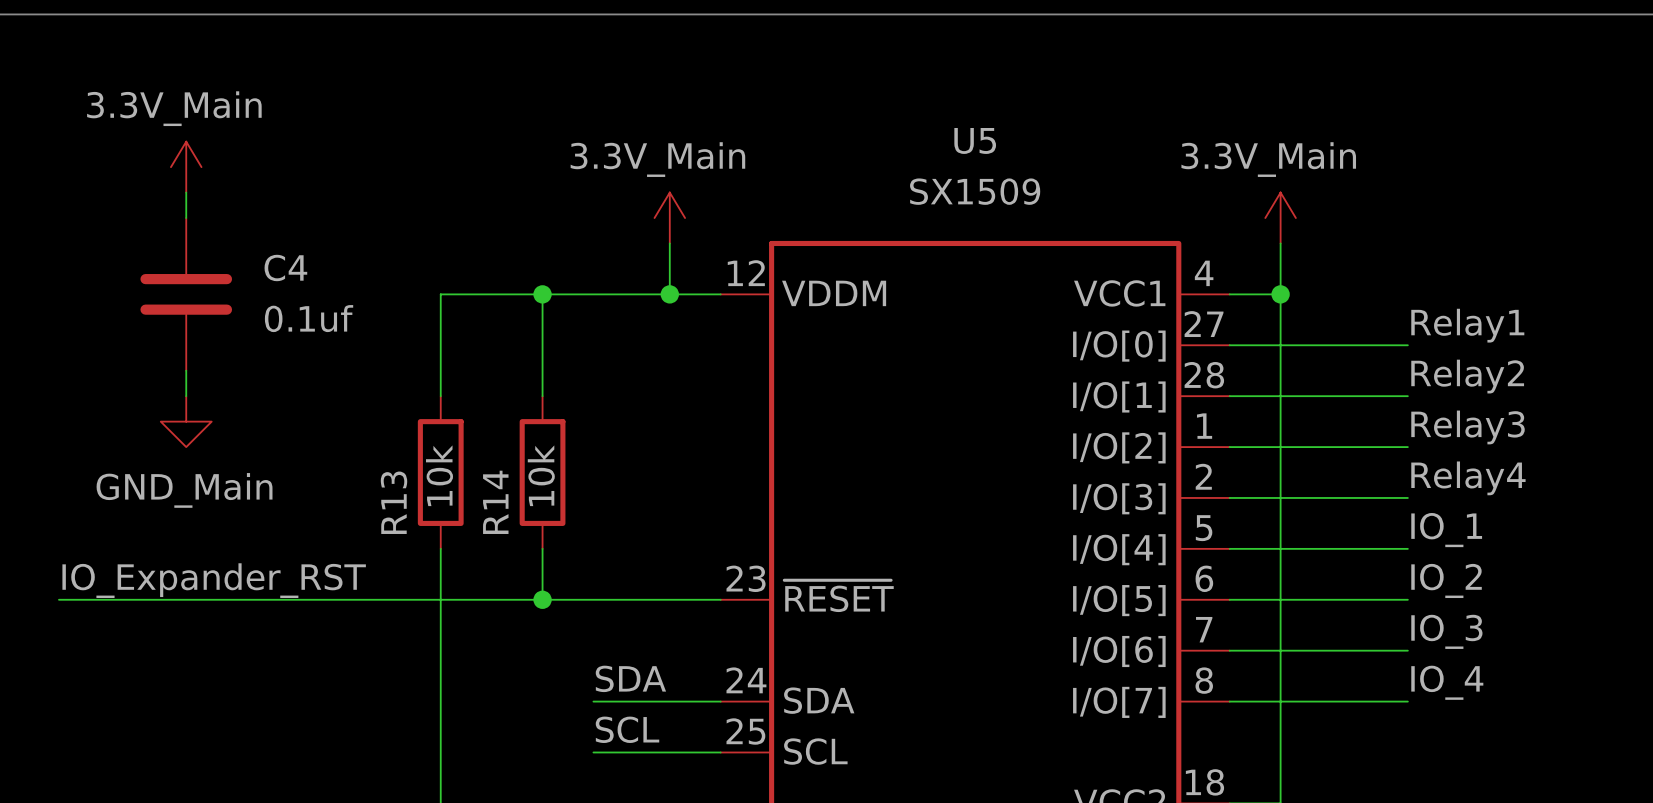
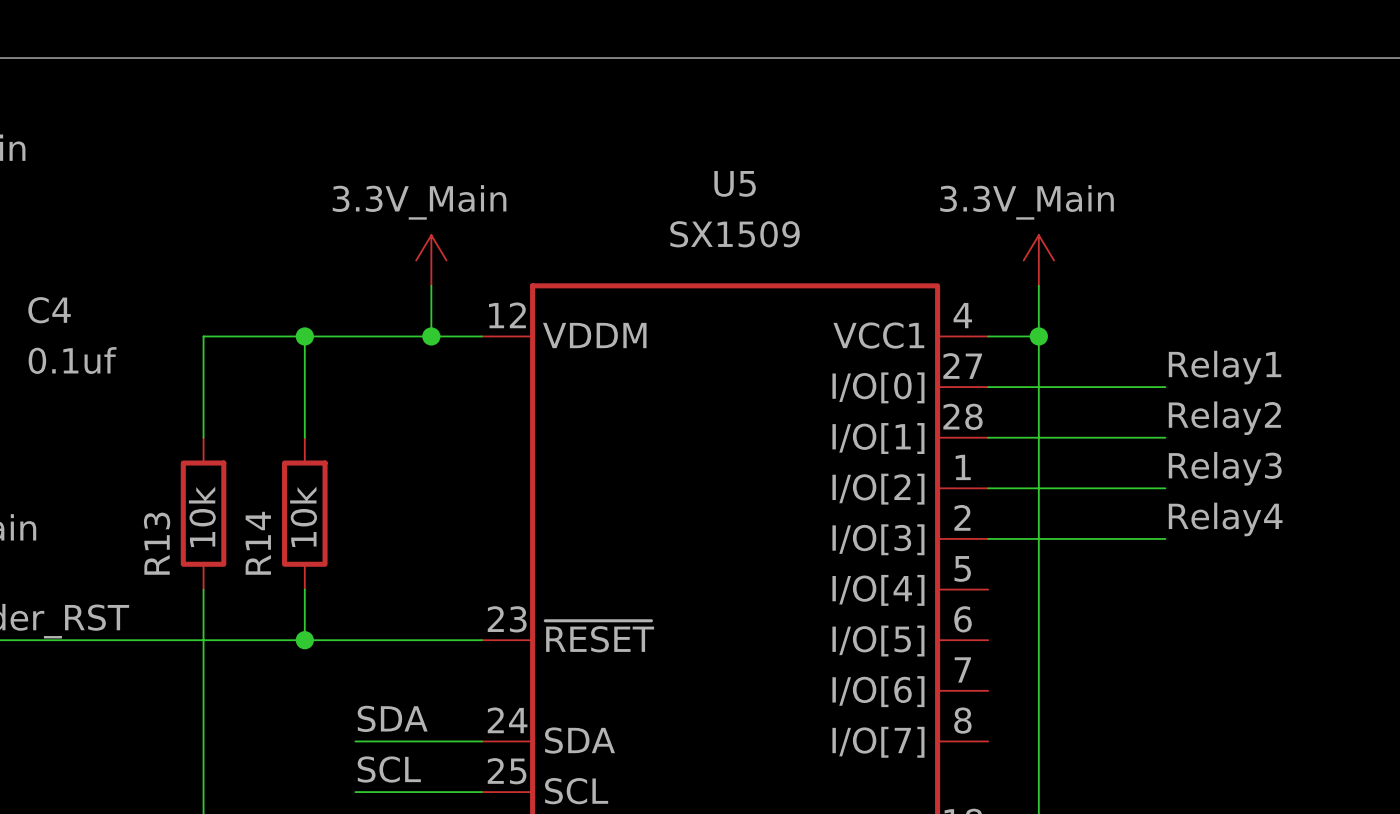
label: IO_1 (1446, 530) -> none
wire: (1229, 548) (1407, 548) -> none
label: IO_2 (1446, 580) -> none
wire: (1229, 599) (1407, 599) -> none
label: IO_3 (1446, 631) -> none
wire: (1229, 650) (1407, 650) -> none
label: IO_4 (1447, 682) -> none
wire: (1229, 701) (1407, 701) -> none

